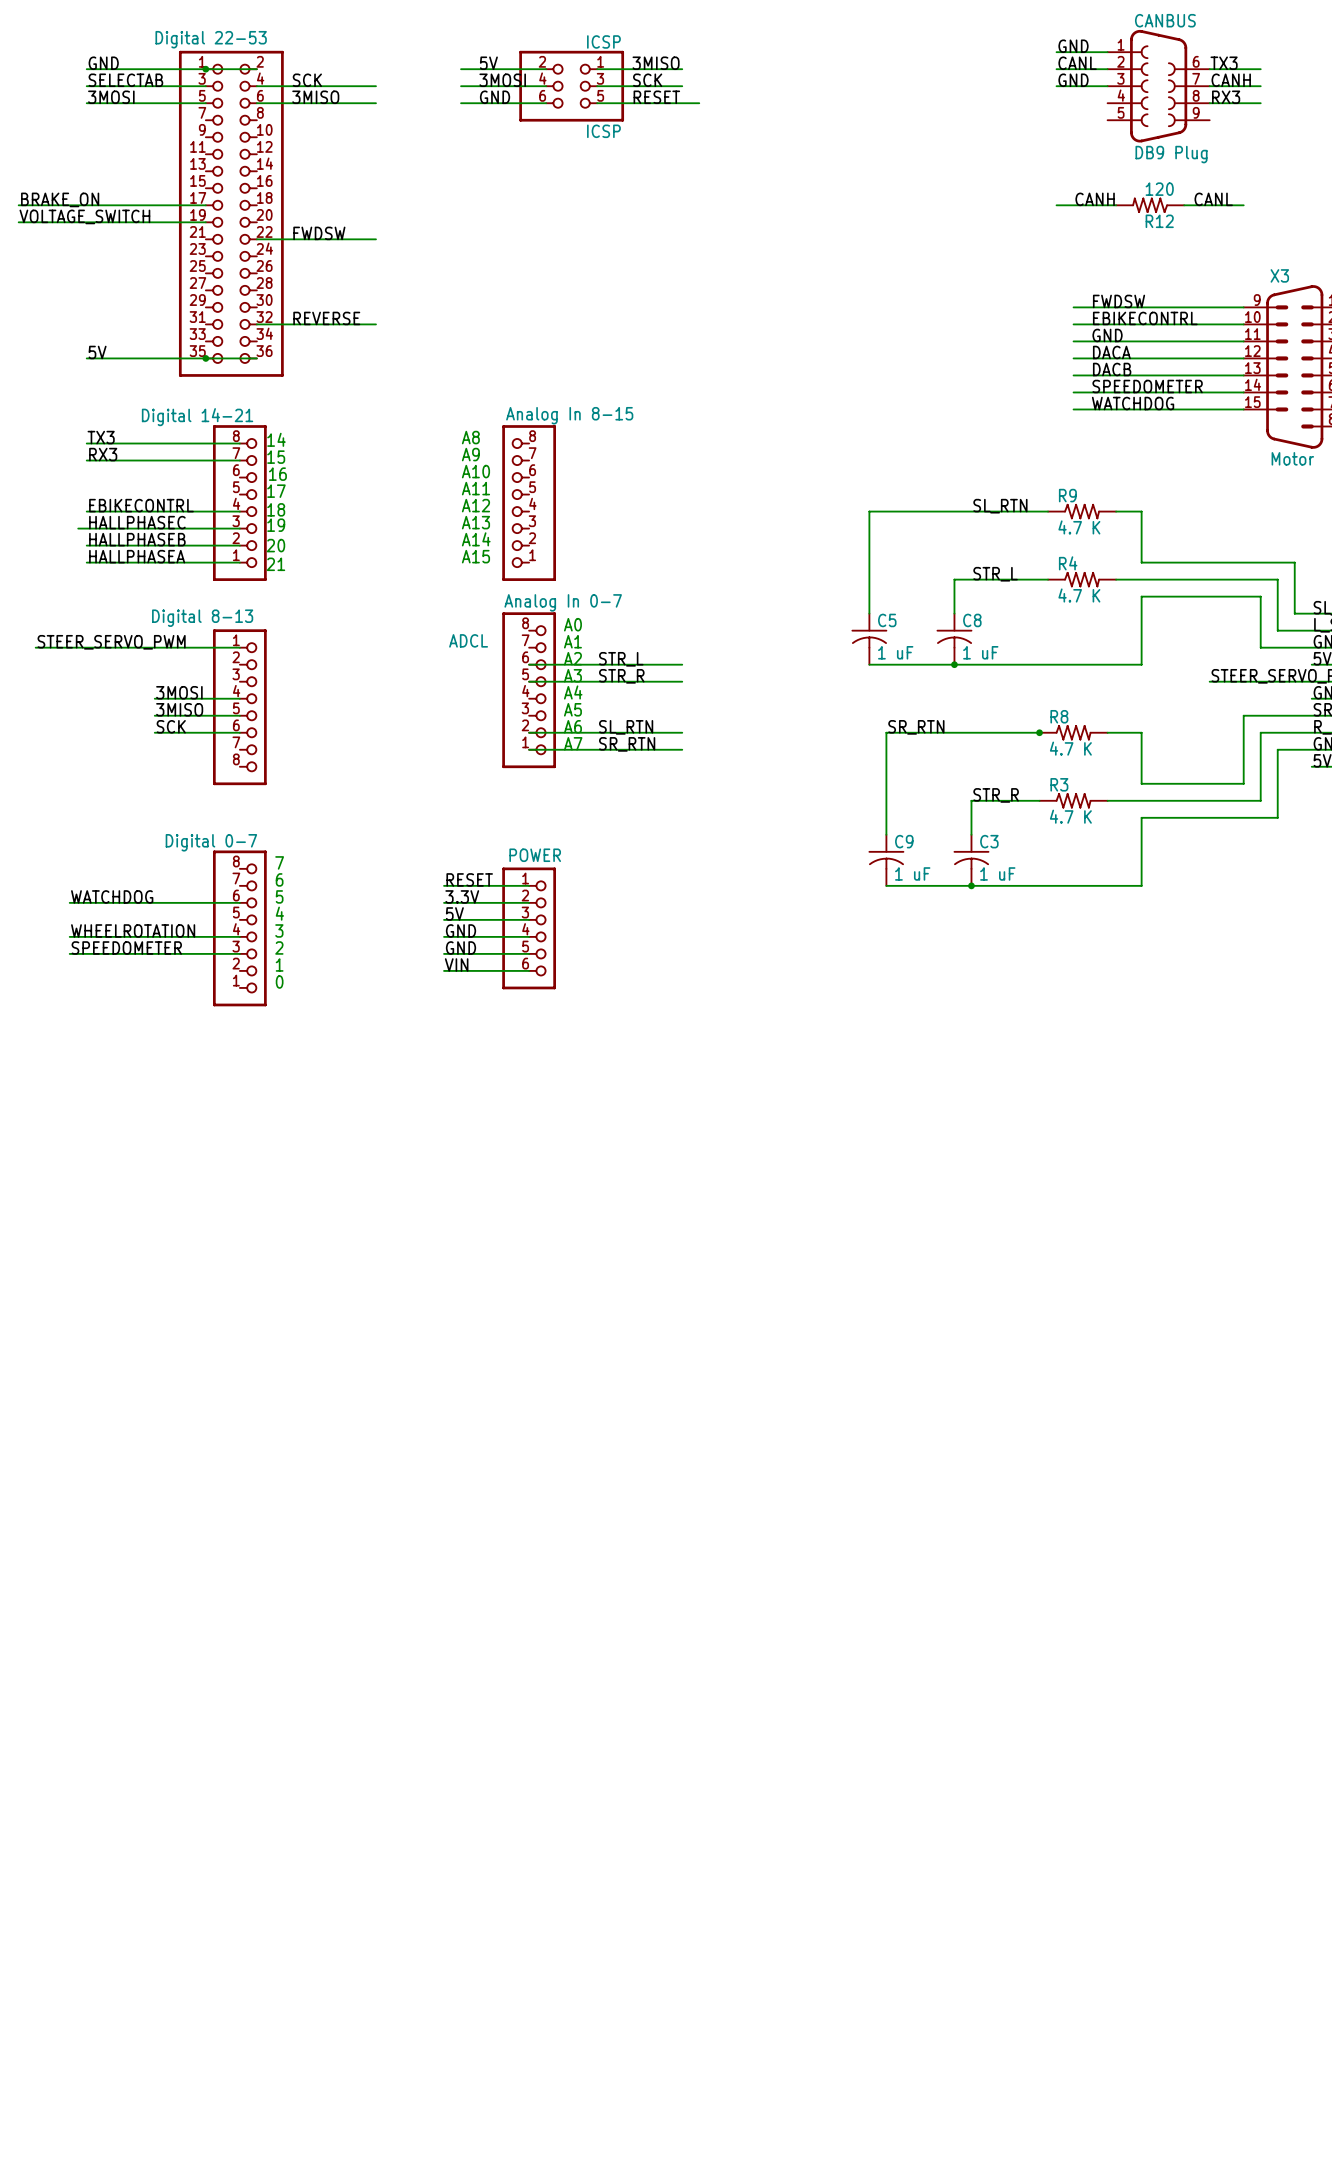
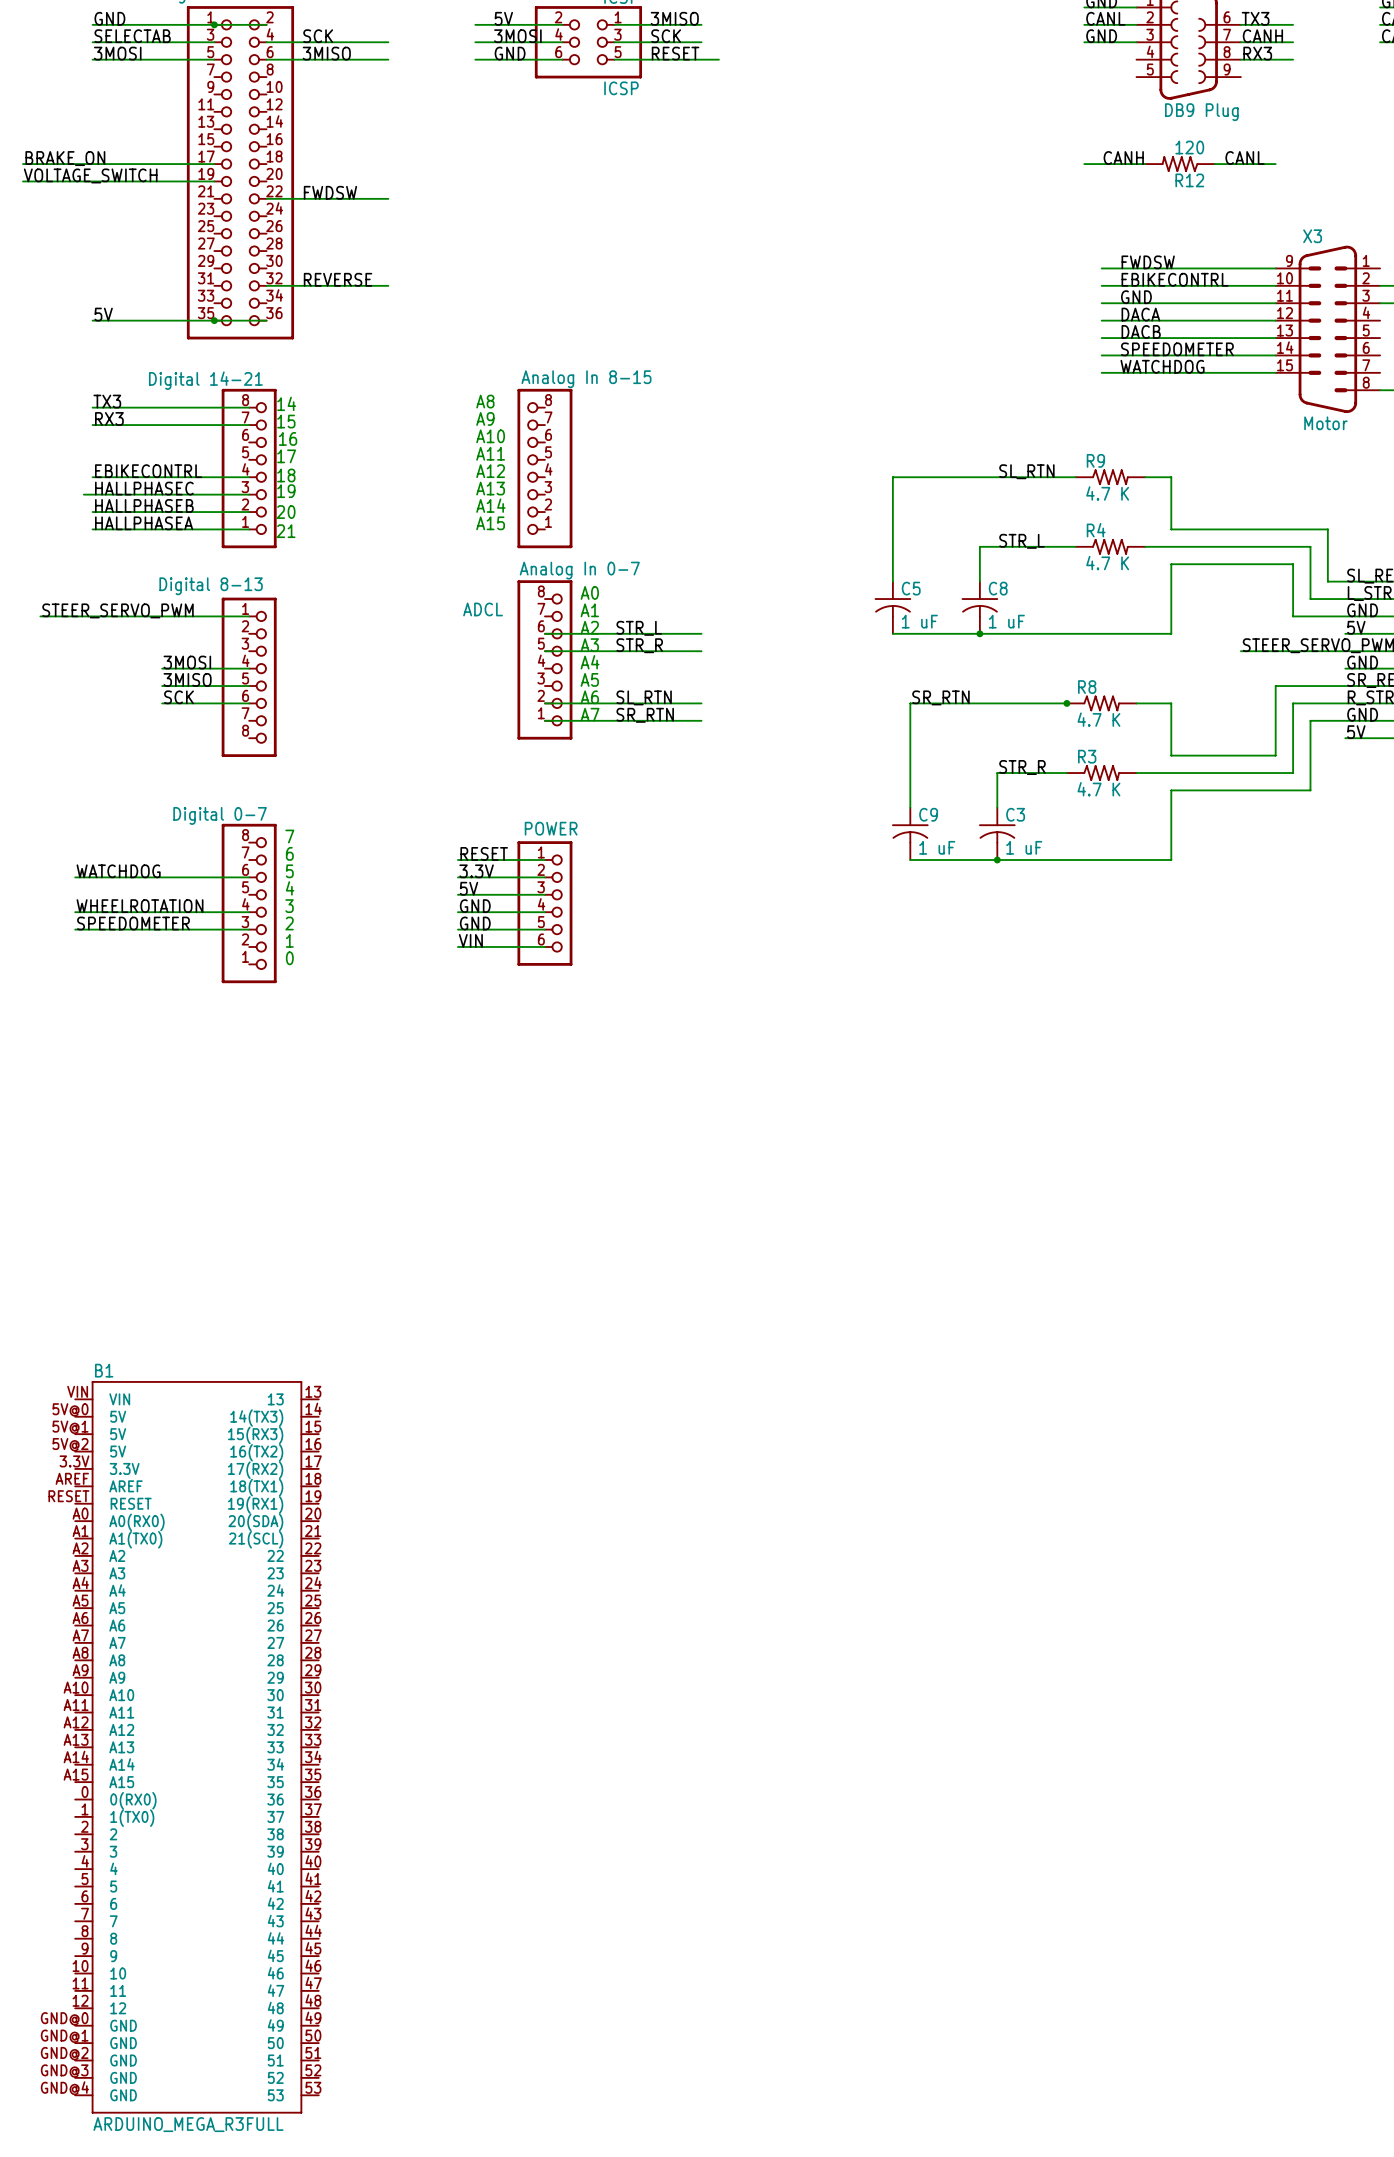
B1: none -> ARDUINO_MEGA_R3FULL (196, 1747)

